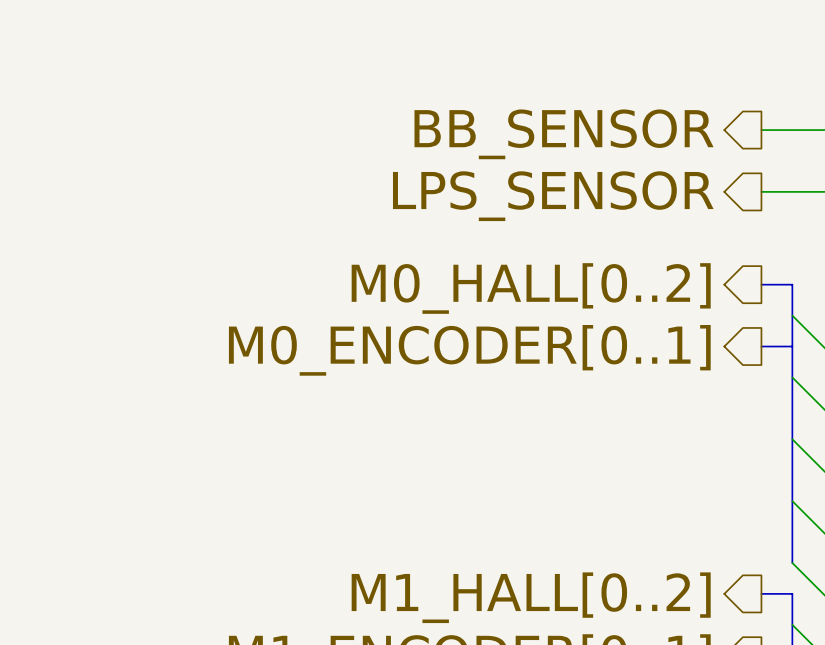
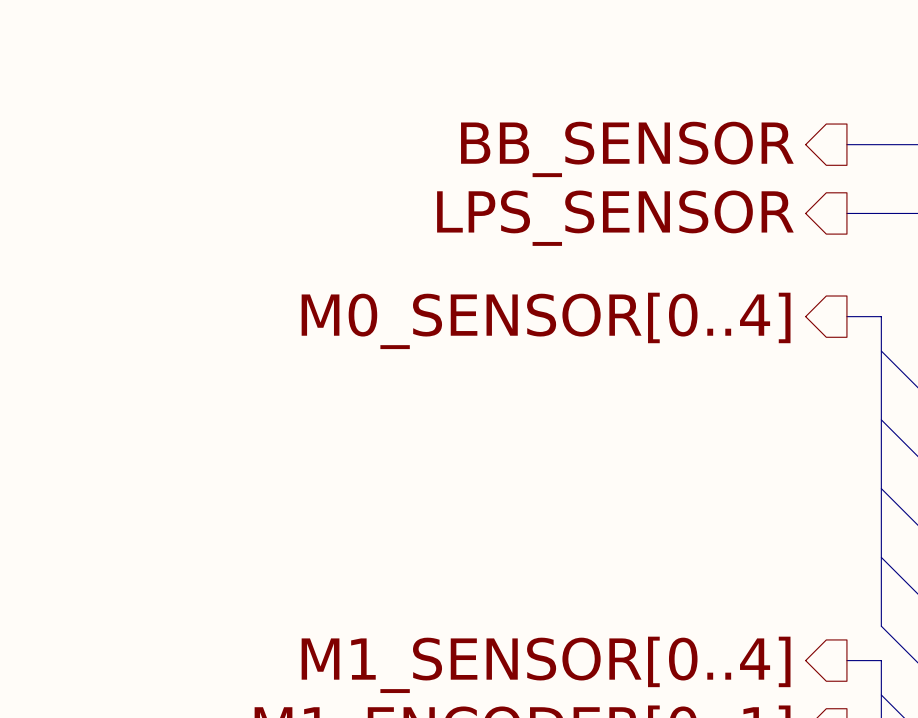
hierarchical label: M0_HALL[0..2] (531, 288) -> M0_SENSOR[0..4] (546, 320)
bus: (761, 346) (792, 346) -> none
hierarchical label: M0_ENCODER[0..1] (469, 350) -> none
hierarchical label: M1_HALL[0..2] (531, 597) -> M1_SENSOR[0..4] (546, 664)

